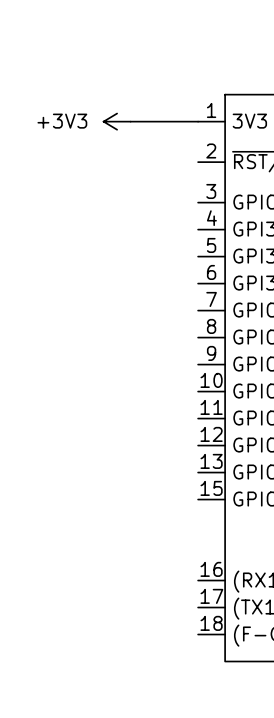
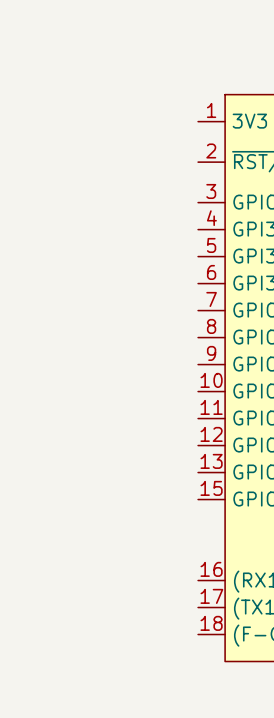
power symbol: +3V3 (117, 121) -> none
wire: (130, 121) (198, 121) -> none

